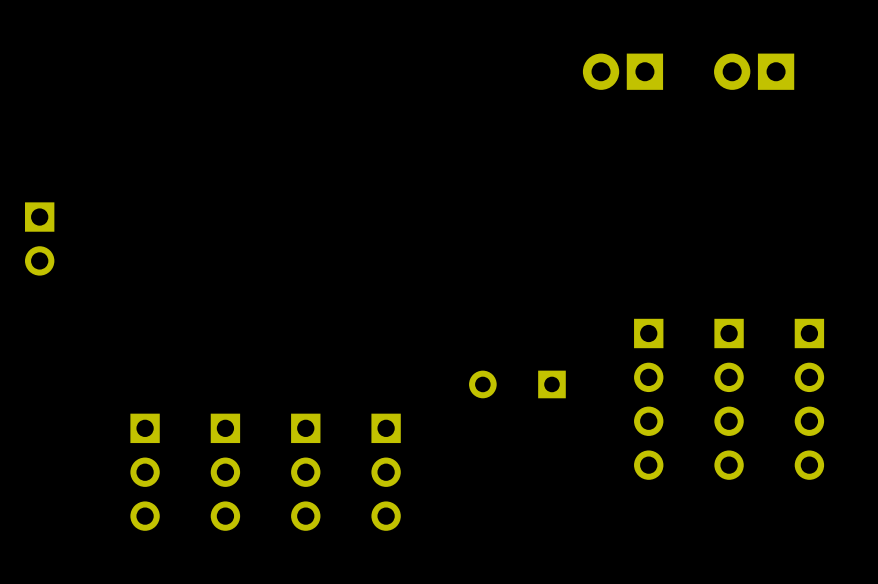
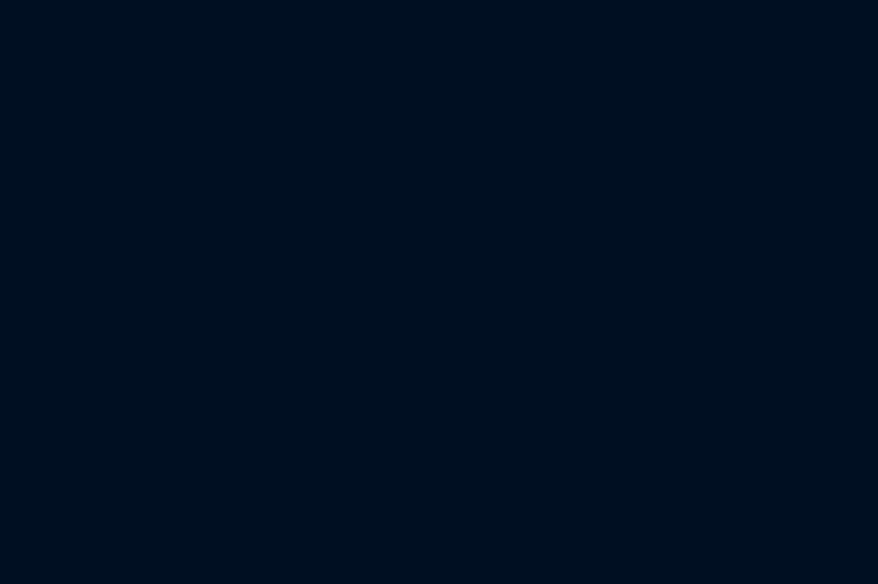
part: (622, 71) -> none
part: (754, 71) -> none
part: (39, 238) -> none
part: (517, 384) -> none
part: (648, 399) -> none
part: (729, 399) -> none
part: (809, 399) -> none
part: (145, 472) -> none
part: (225, 472) -> none
part: (305, 472) -> none
part: (386, 472) -> none

